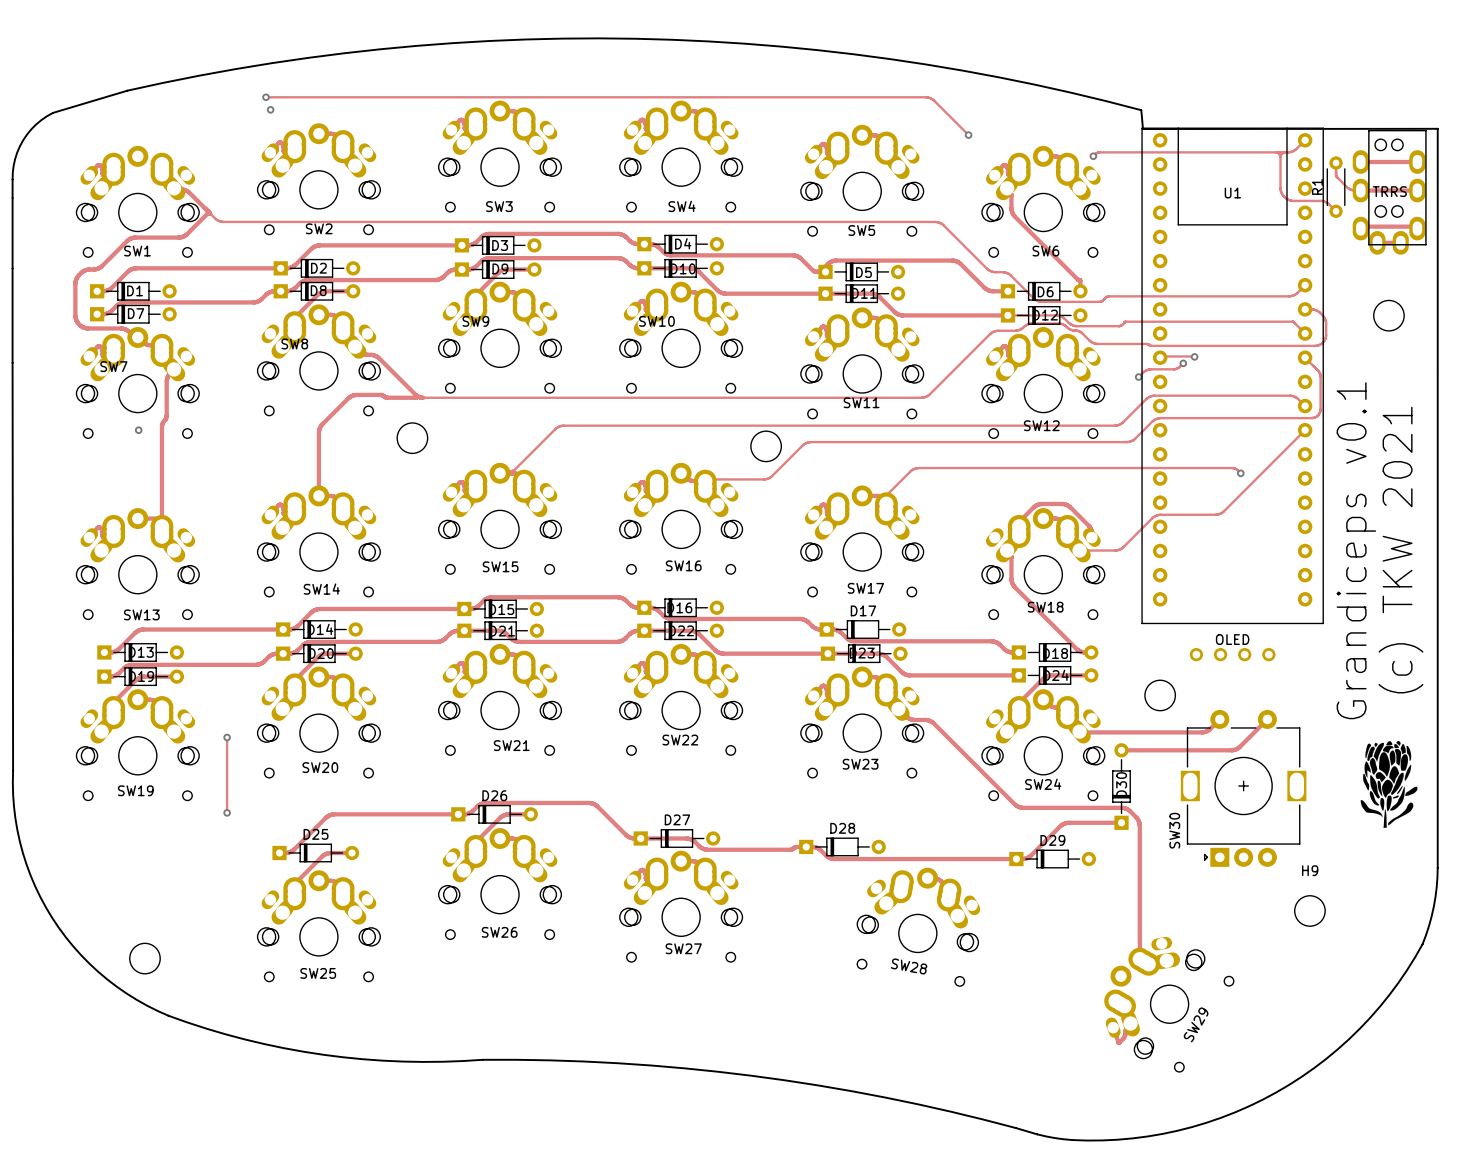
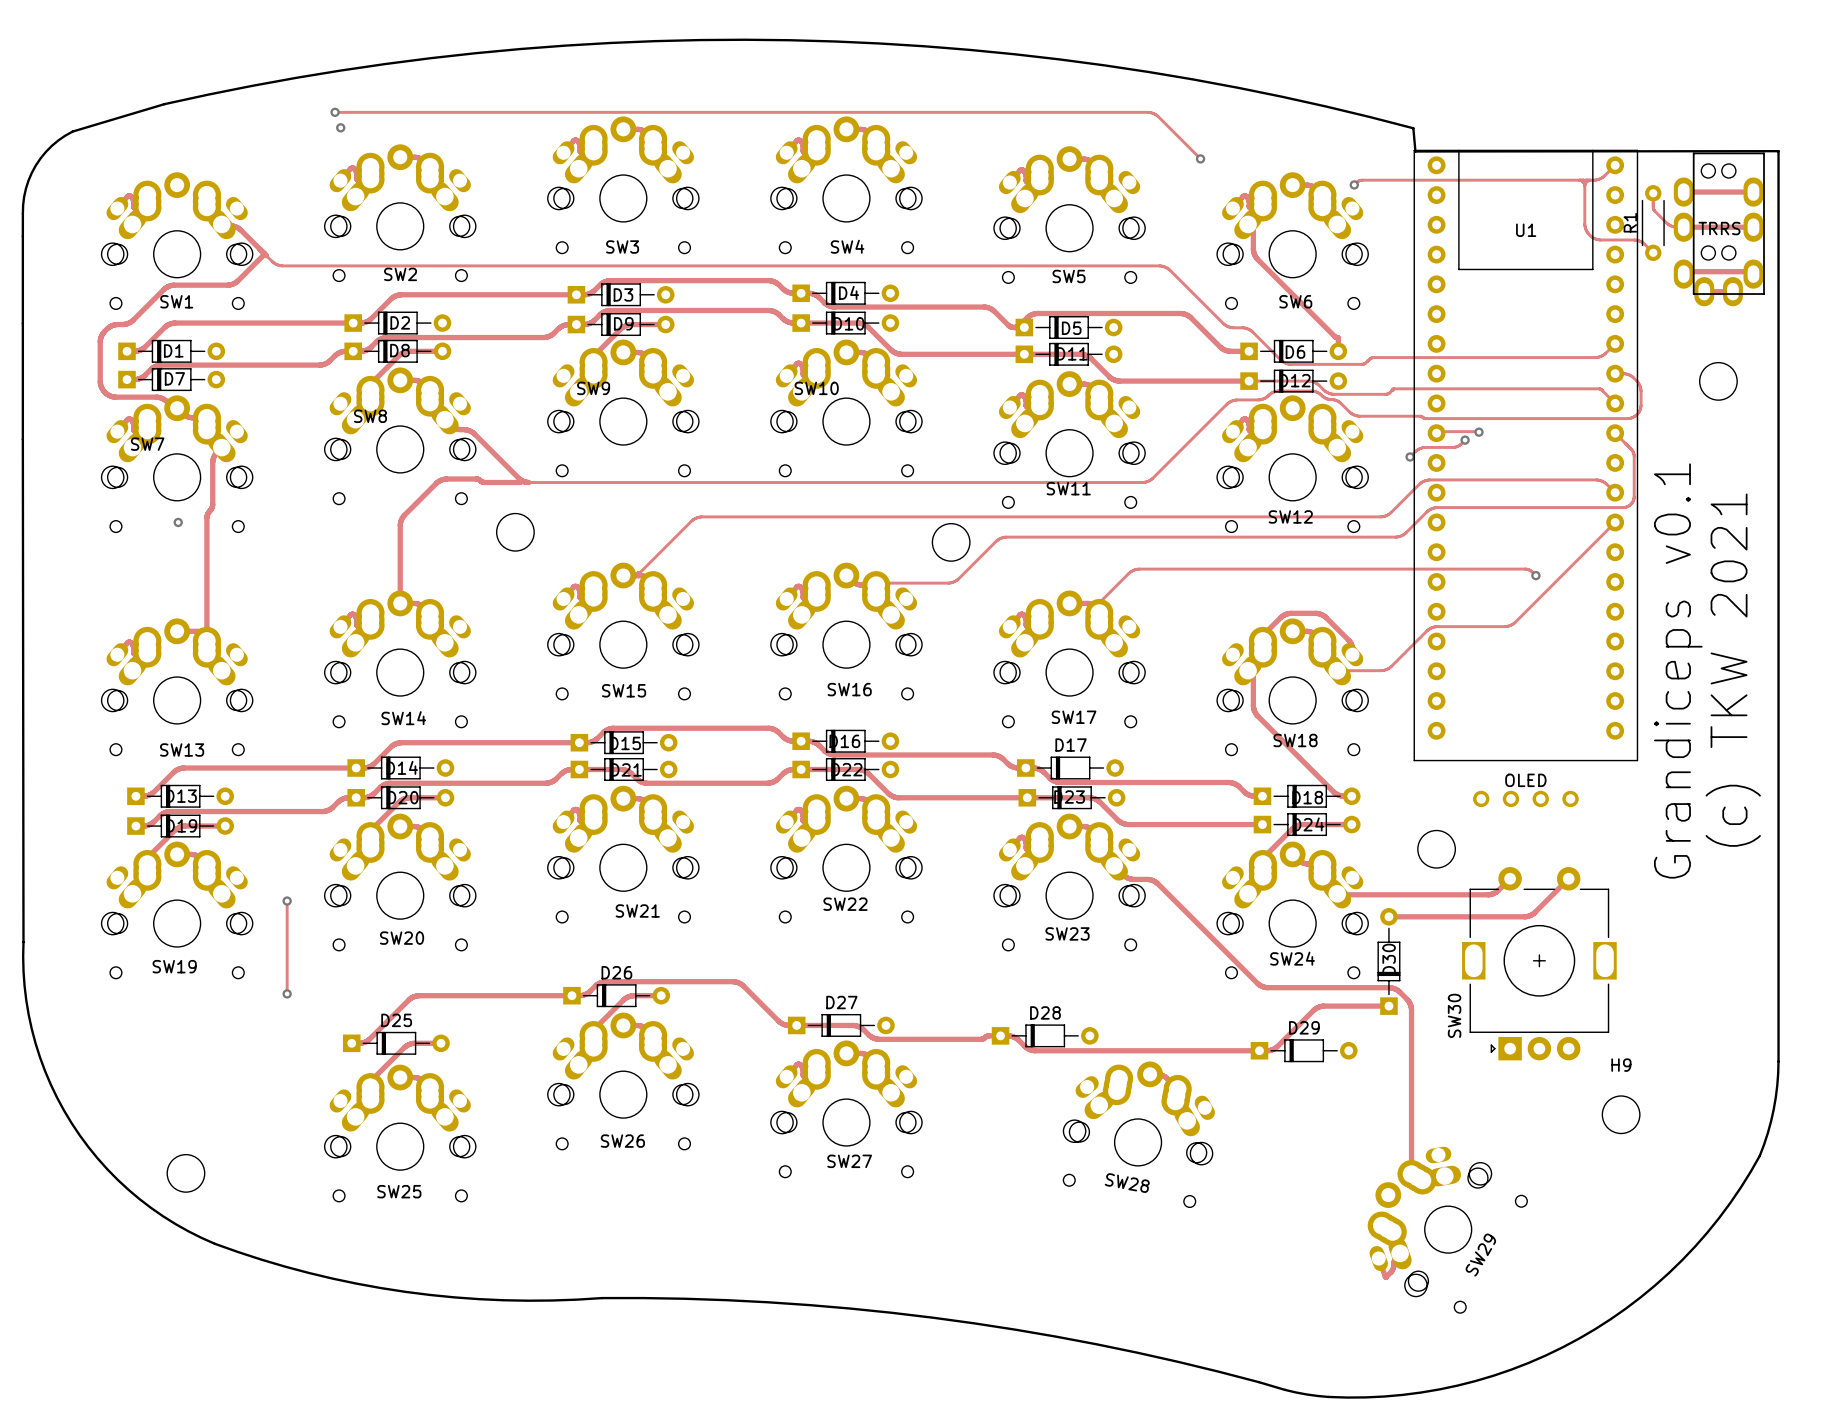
drawing: [1360, 740, 1418, 828] -> none

